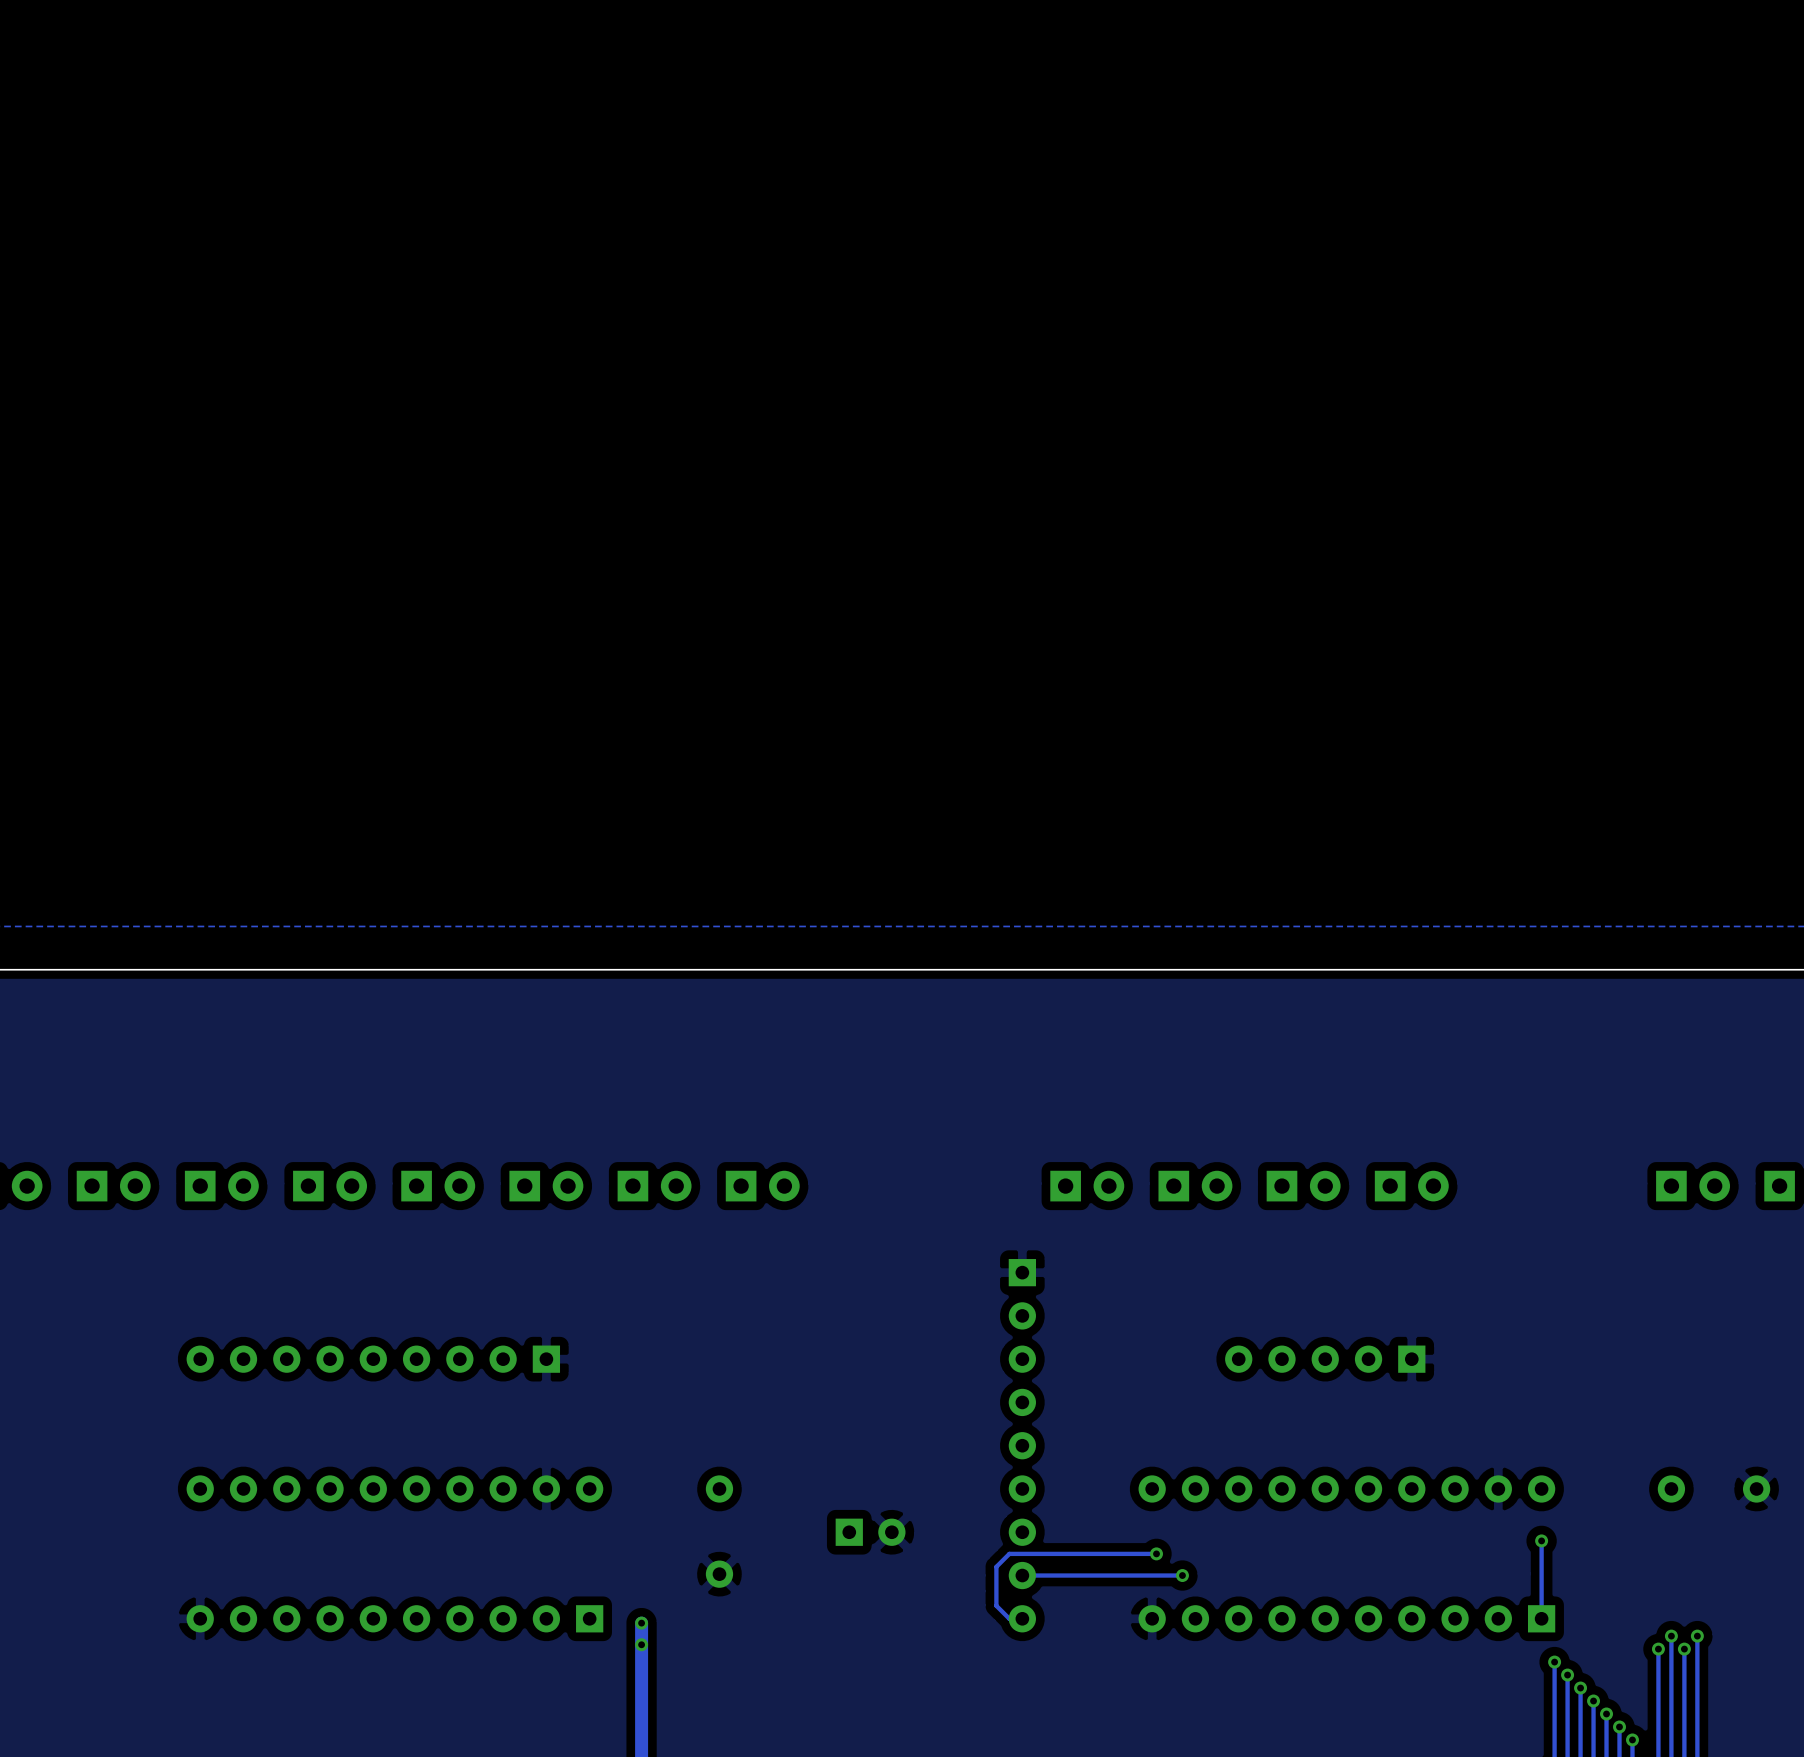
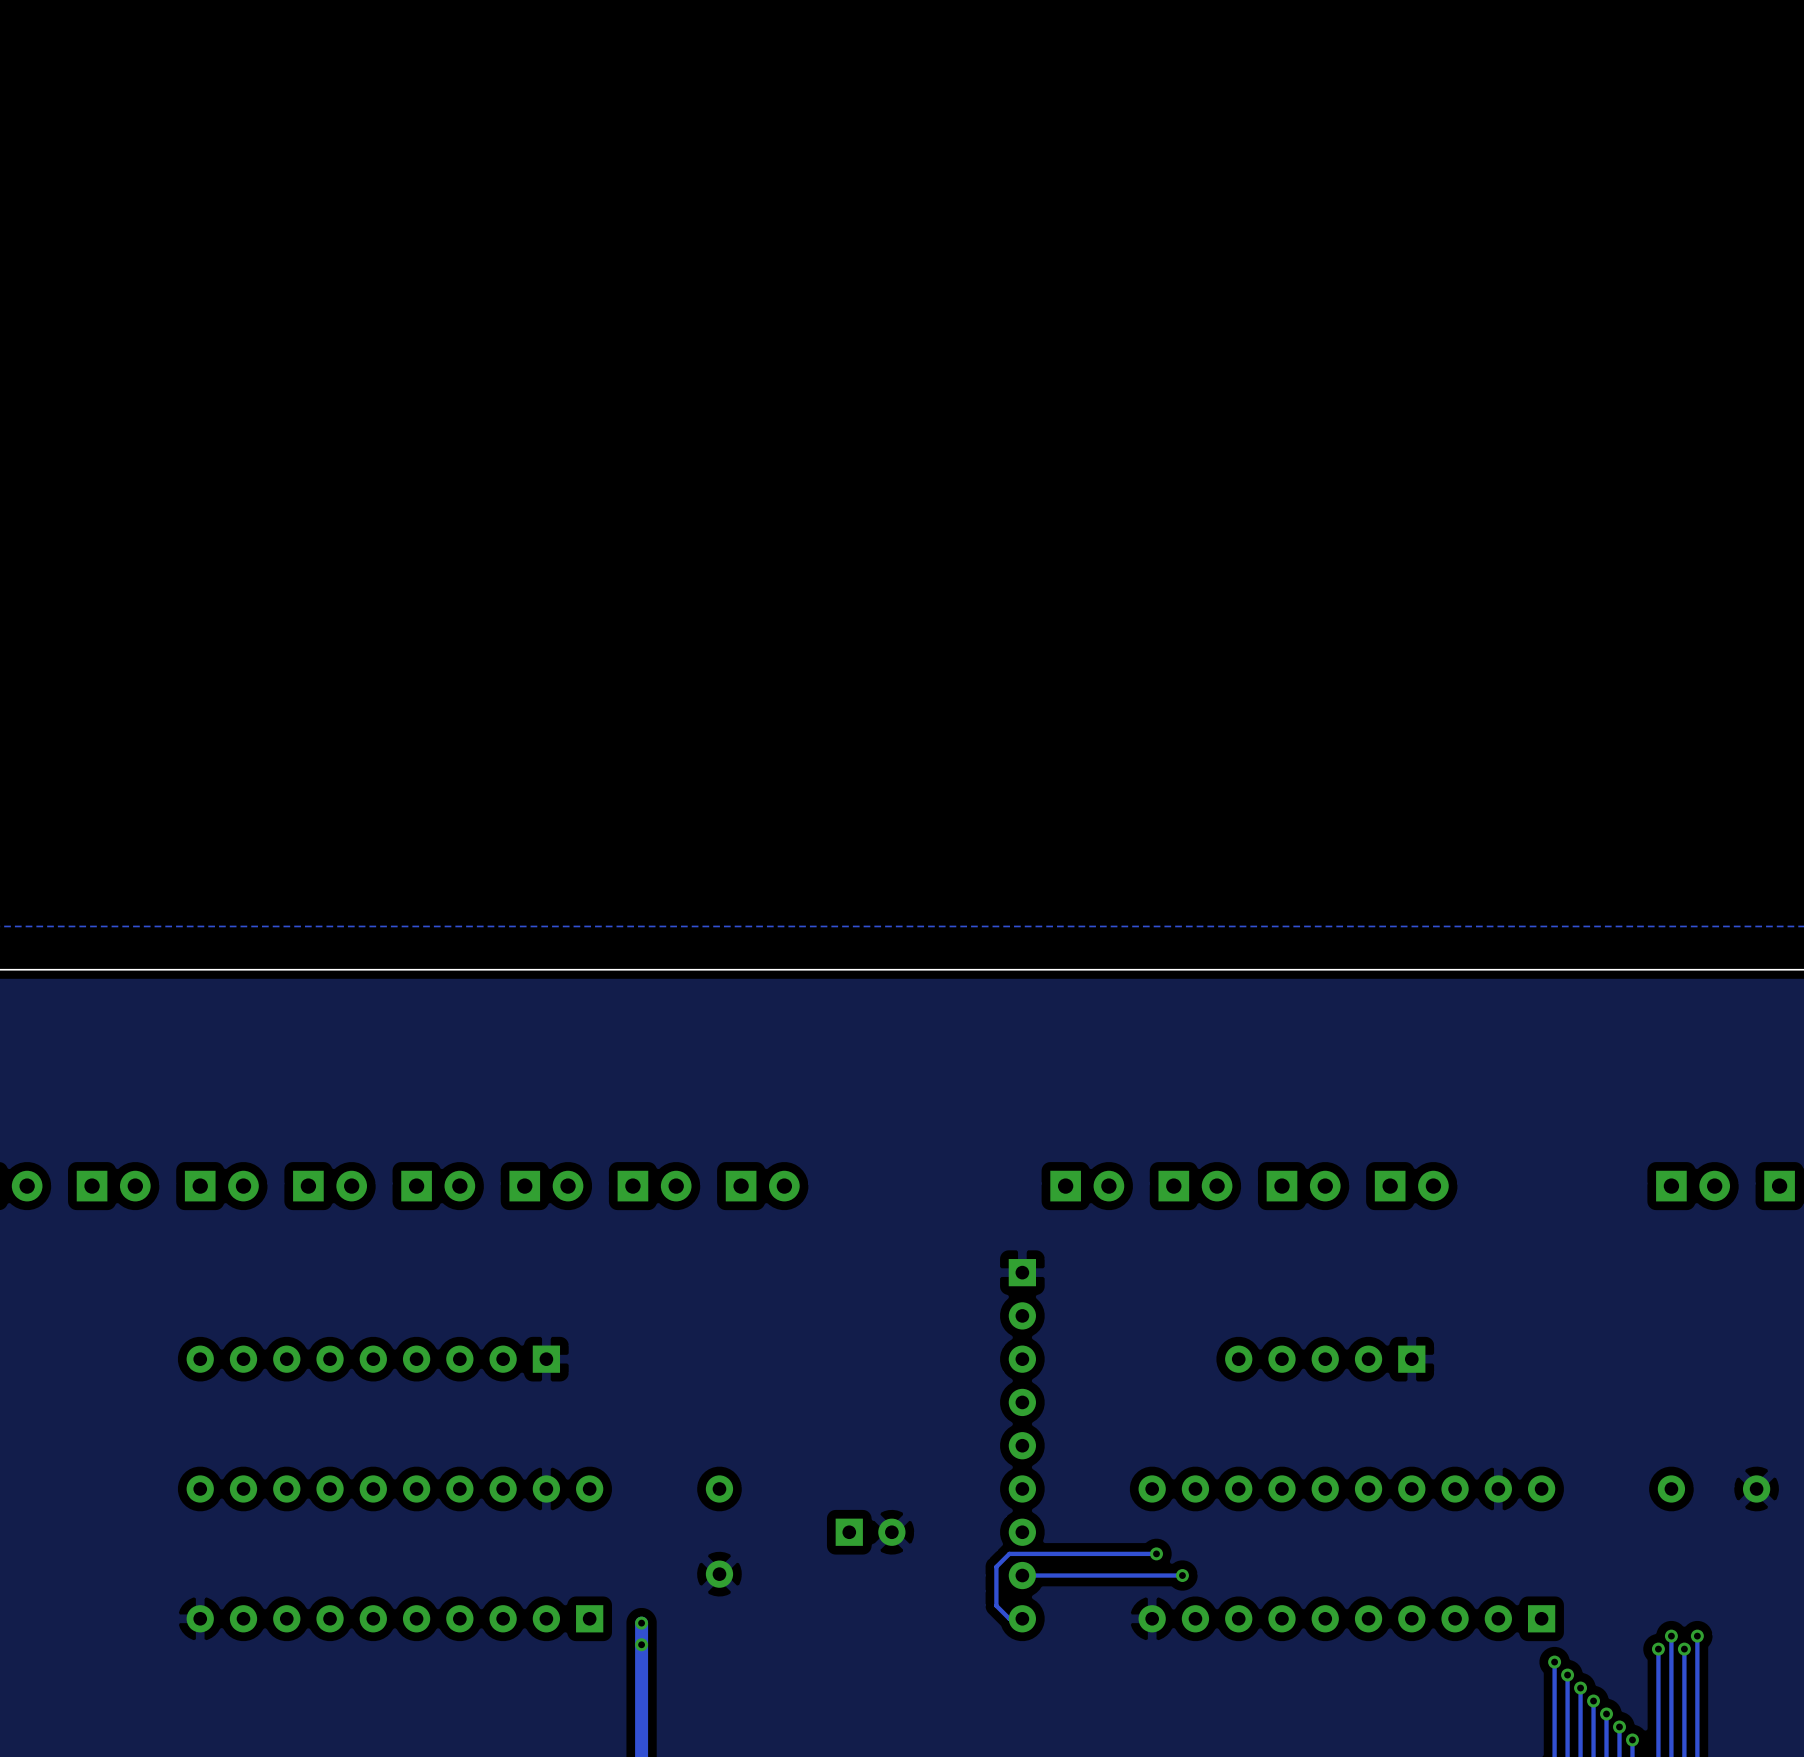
track: (1541, 1540) (1541, 1618) -> none
via: (1541, 1540) -> none

